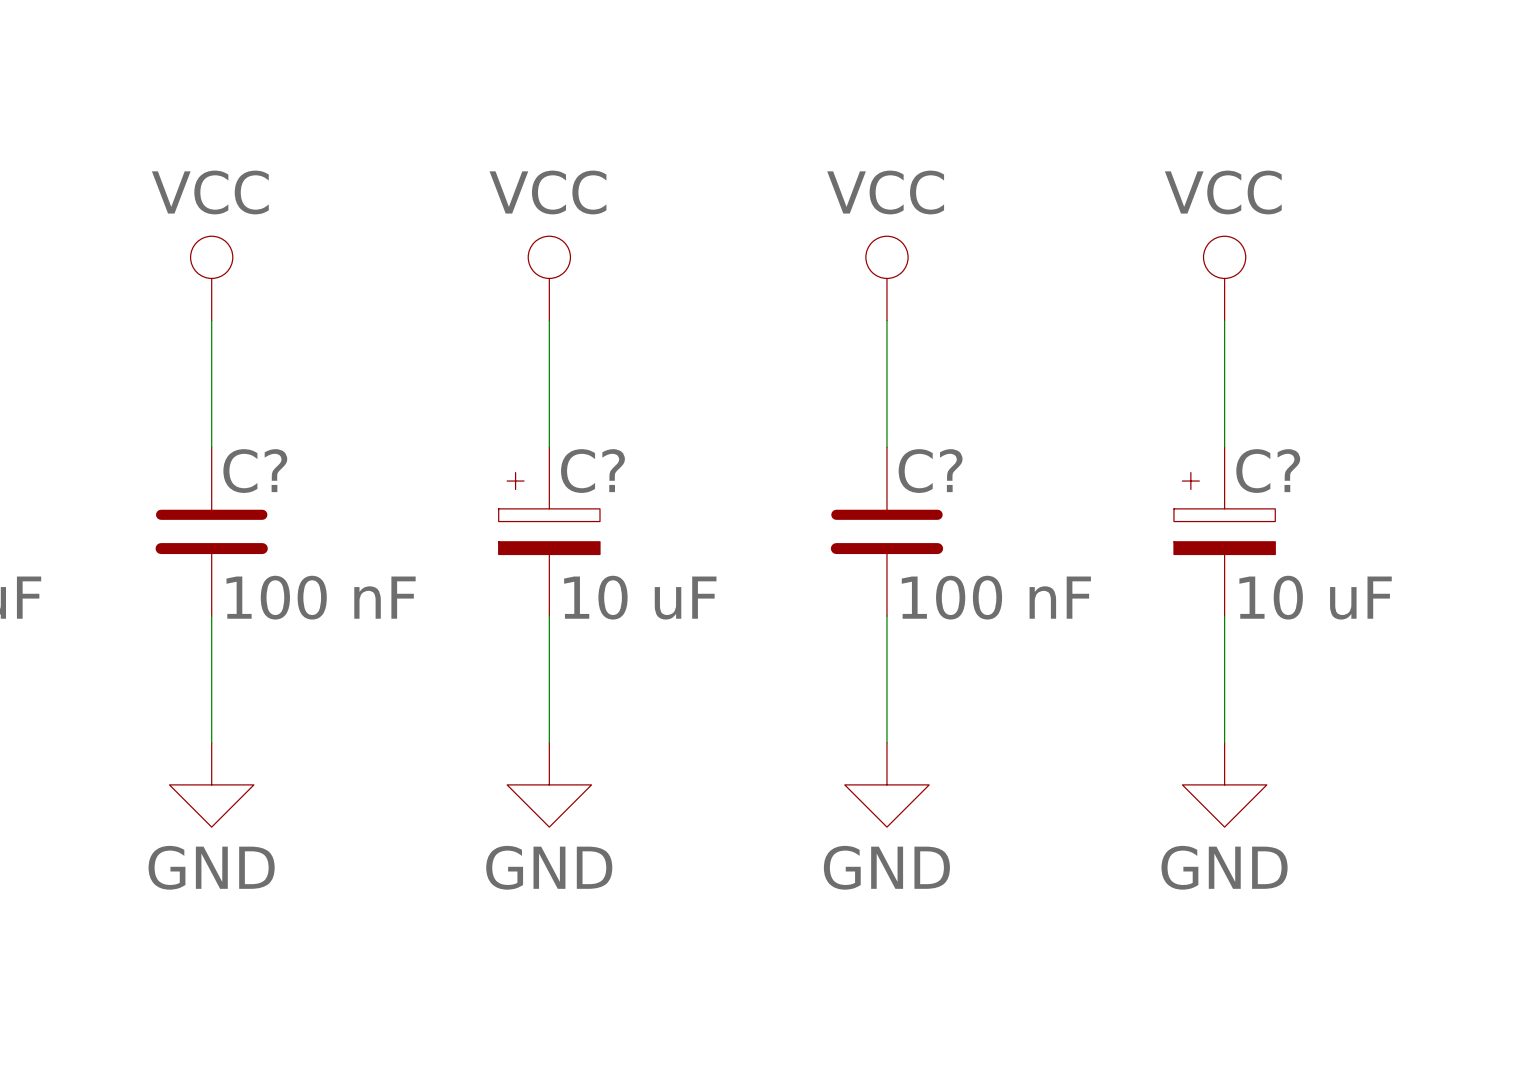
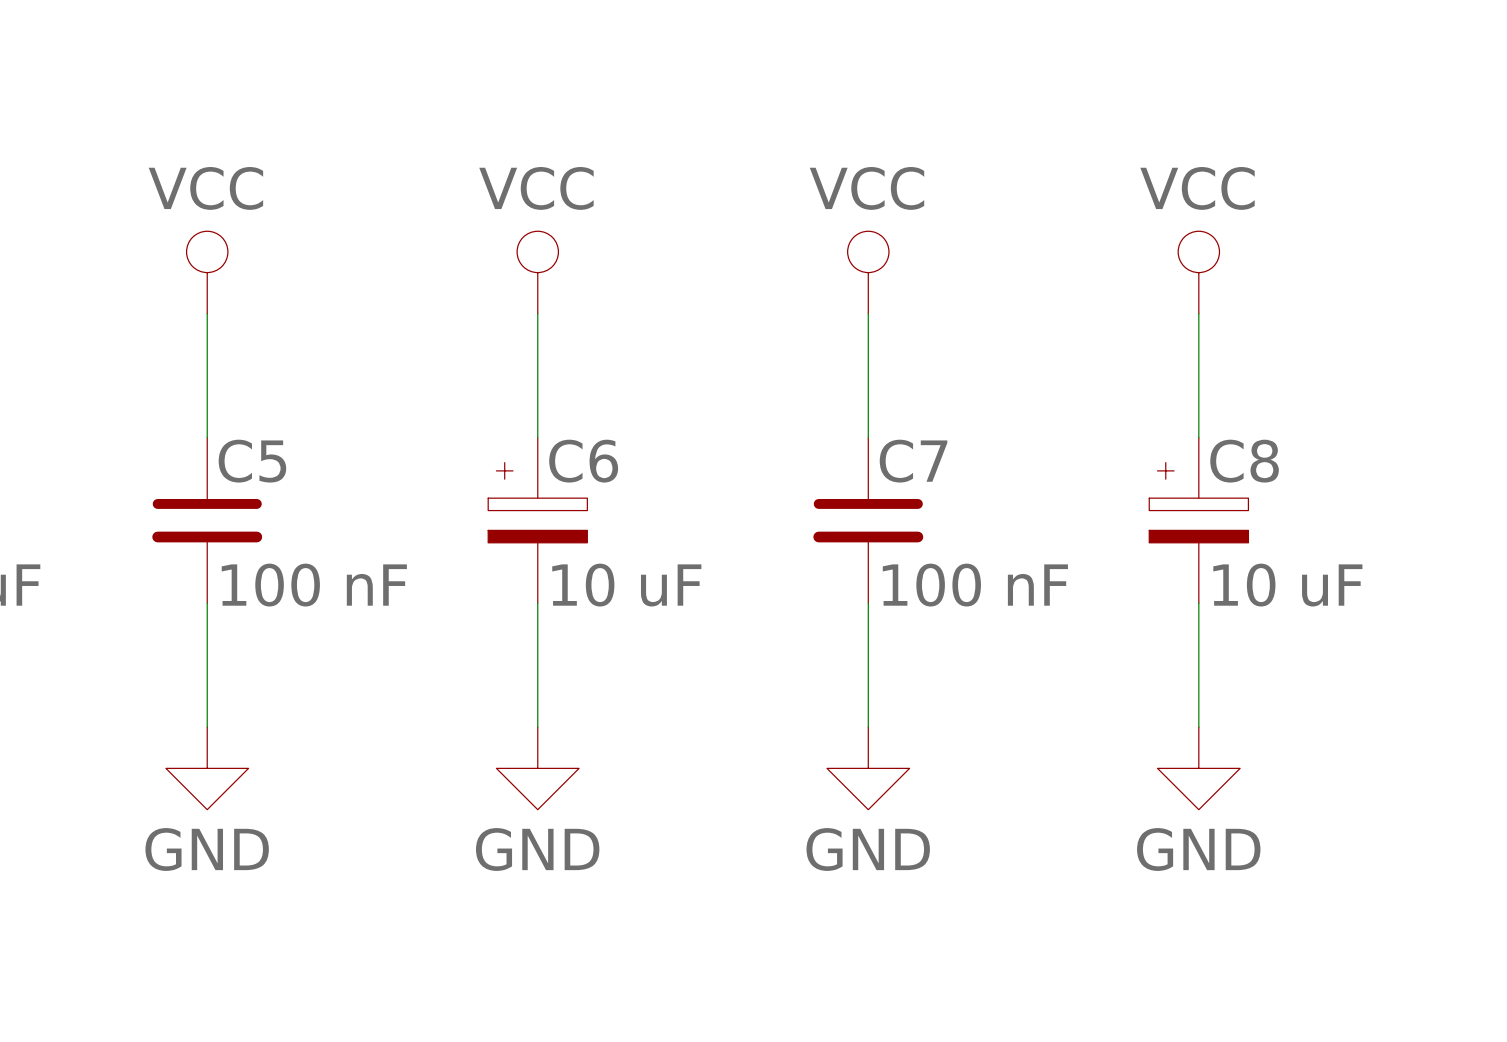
C? name: C? (255, 471) -> C5 (252, 461)
C? name: C? (592, 471) -> C6 (583, 461)
C? name: C? (930, 471) -> C7 (913, 461)
C? name: C? (1268, 471) -> C8 (1244, 461)

